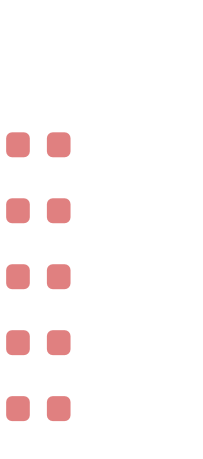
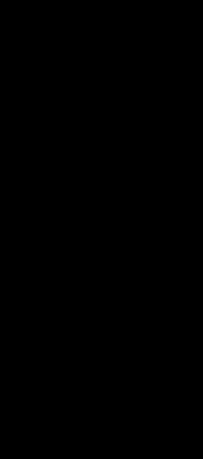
part: (38, 144) -> none
part: (38, 210) -> none
part: (38, 276) -> none
part: (38, 342) -> none
part: (38, 408) -> none

